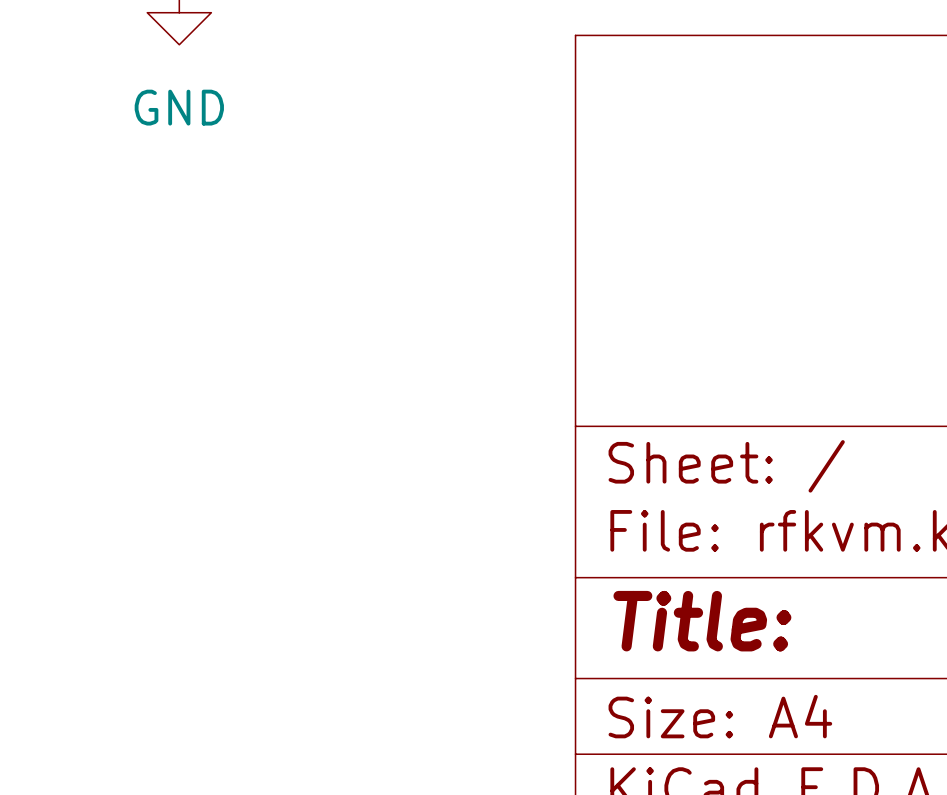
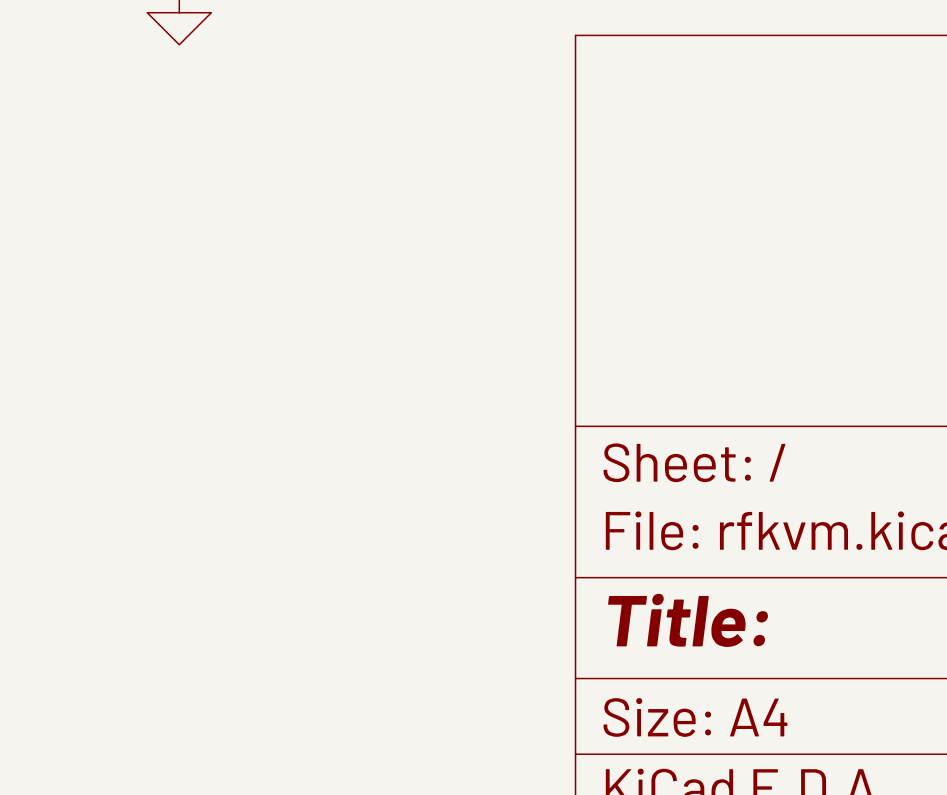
power symbol text: GND (179, 107) -> none

